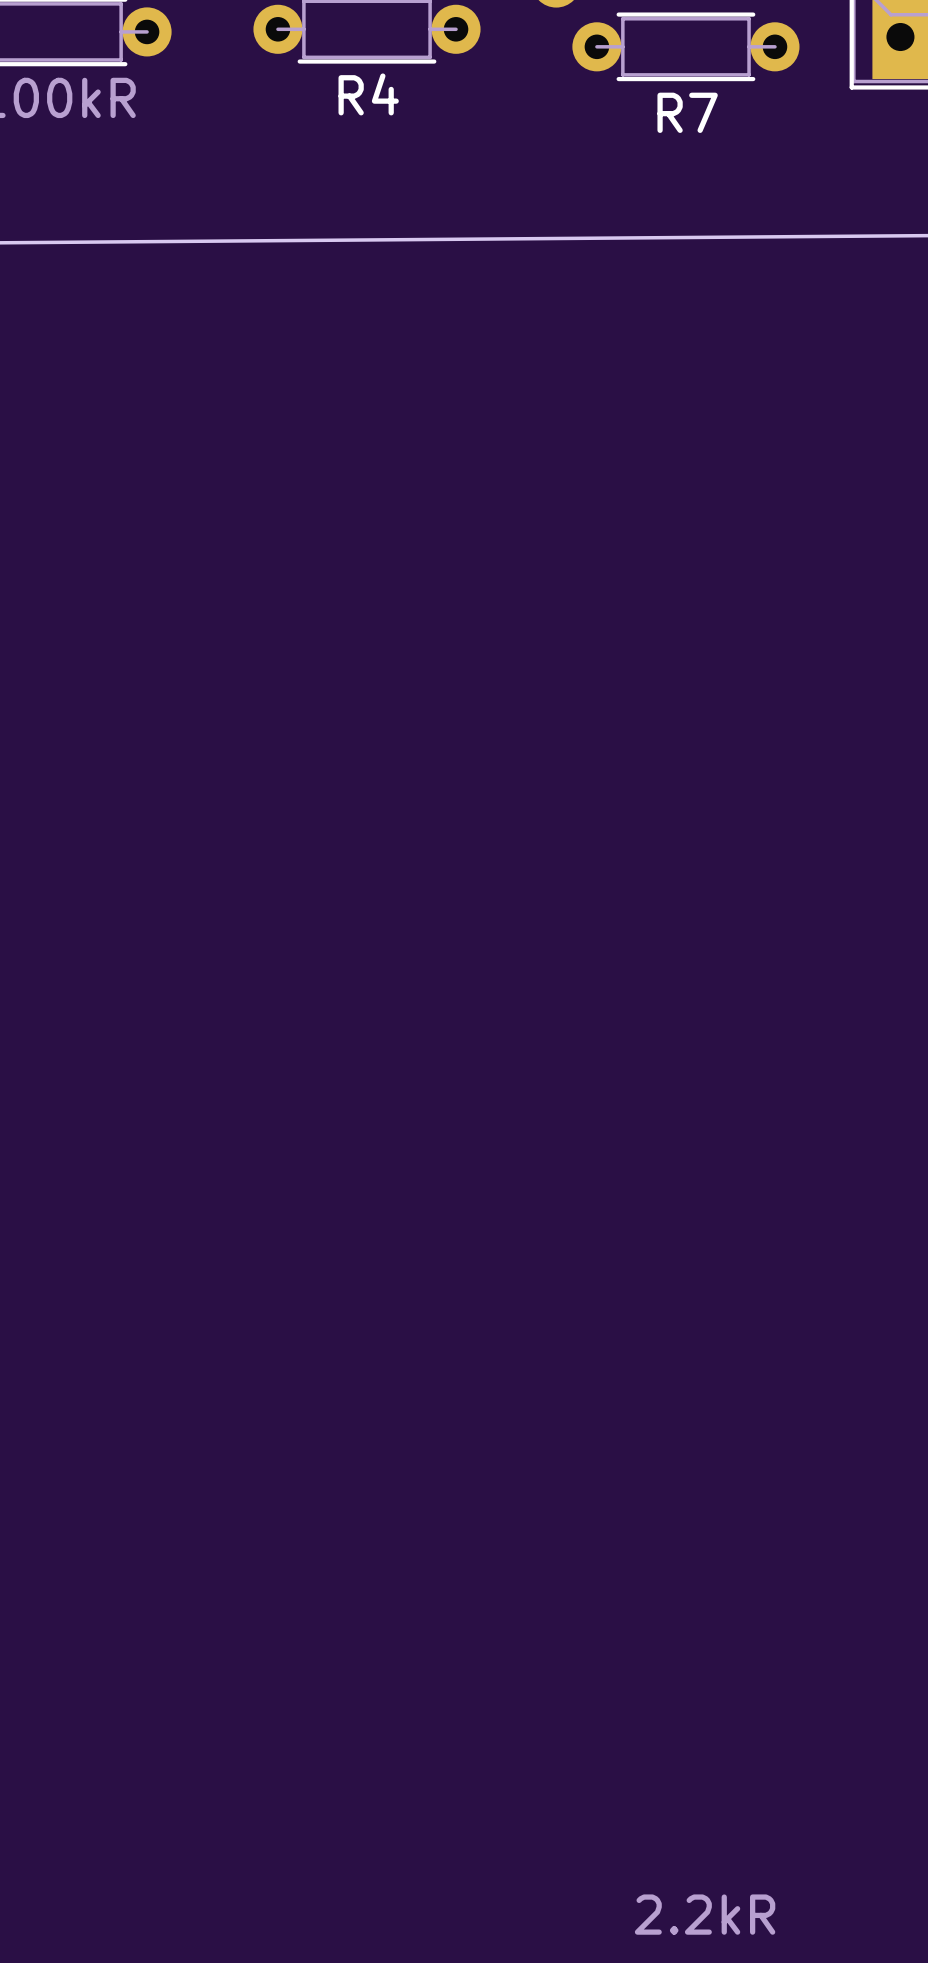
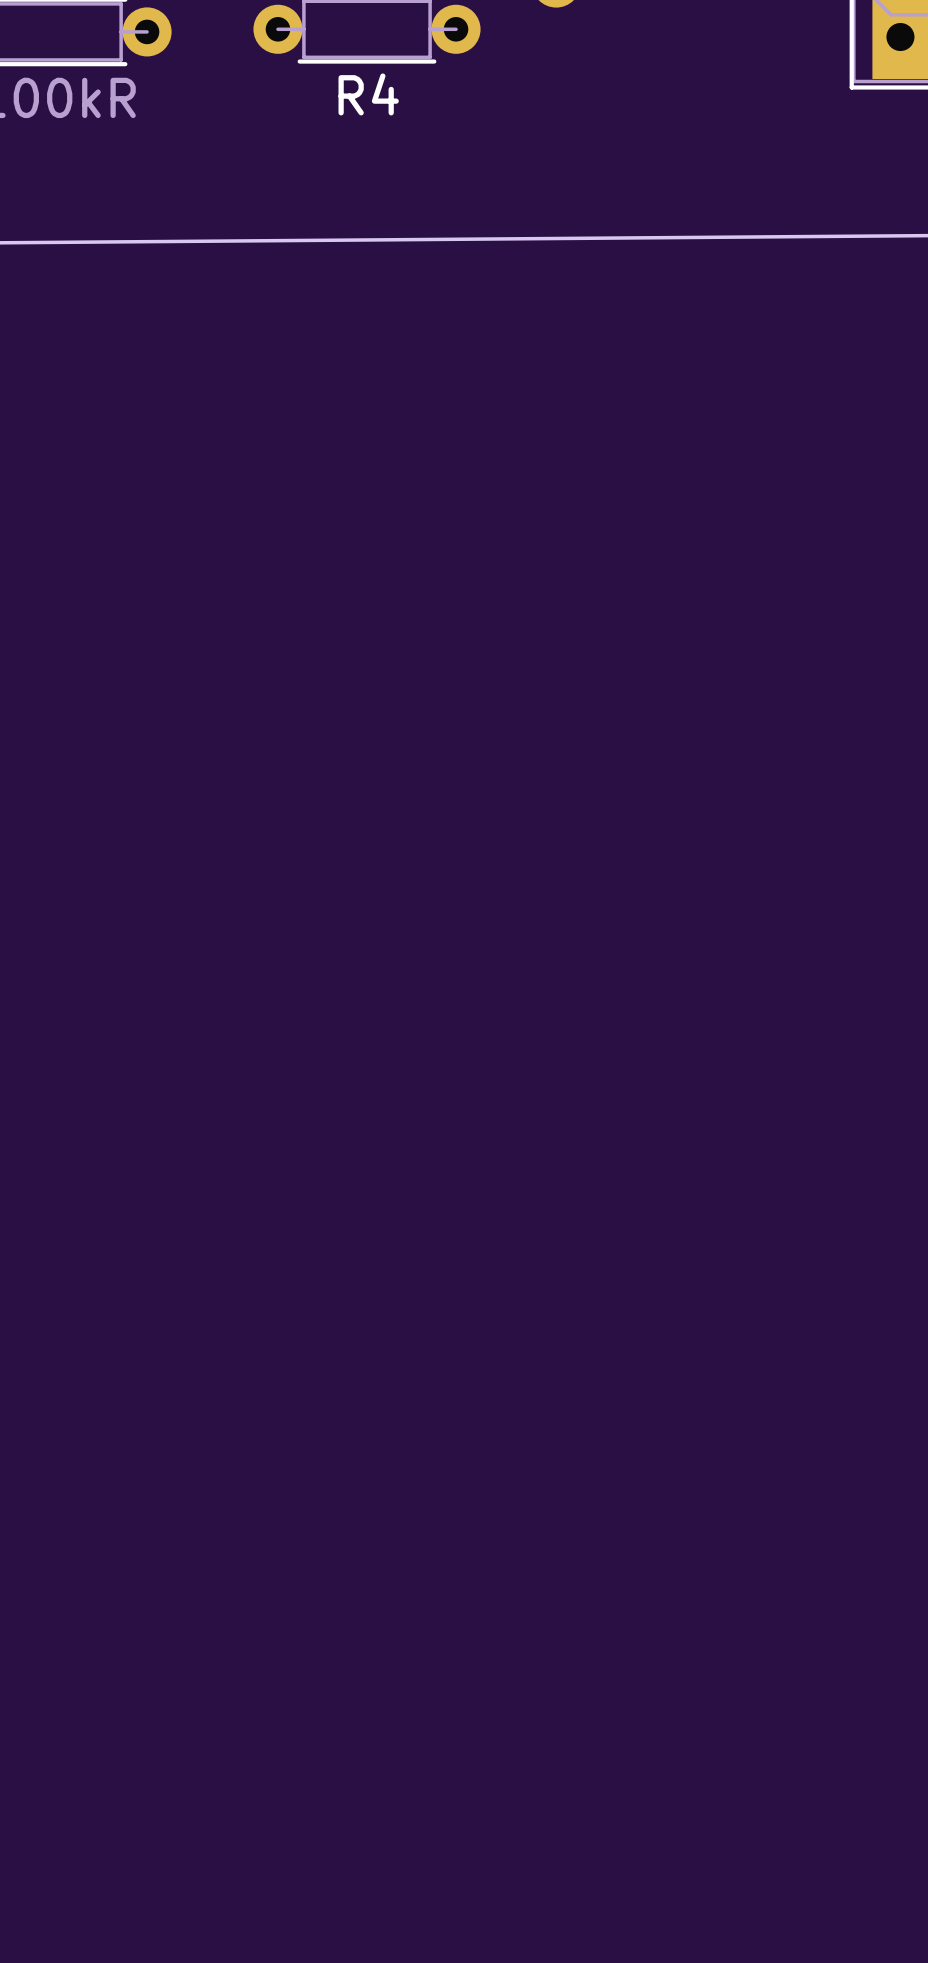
R7: 2.2kR (685, 46) -> none

